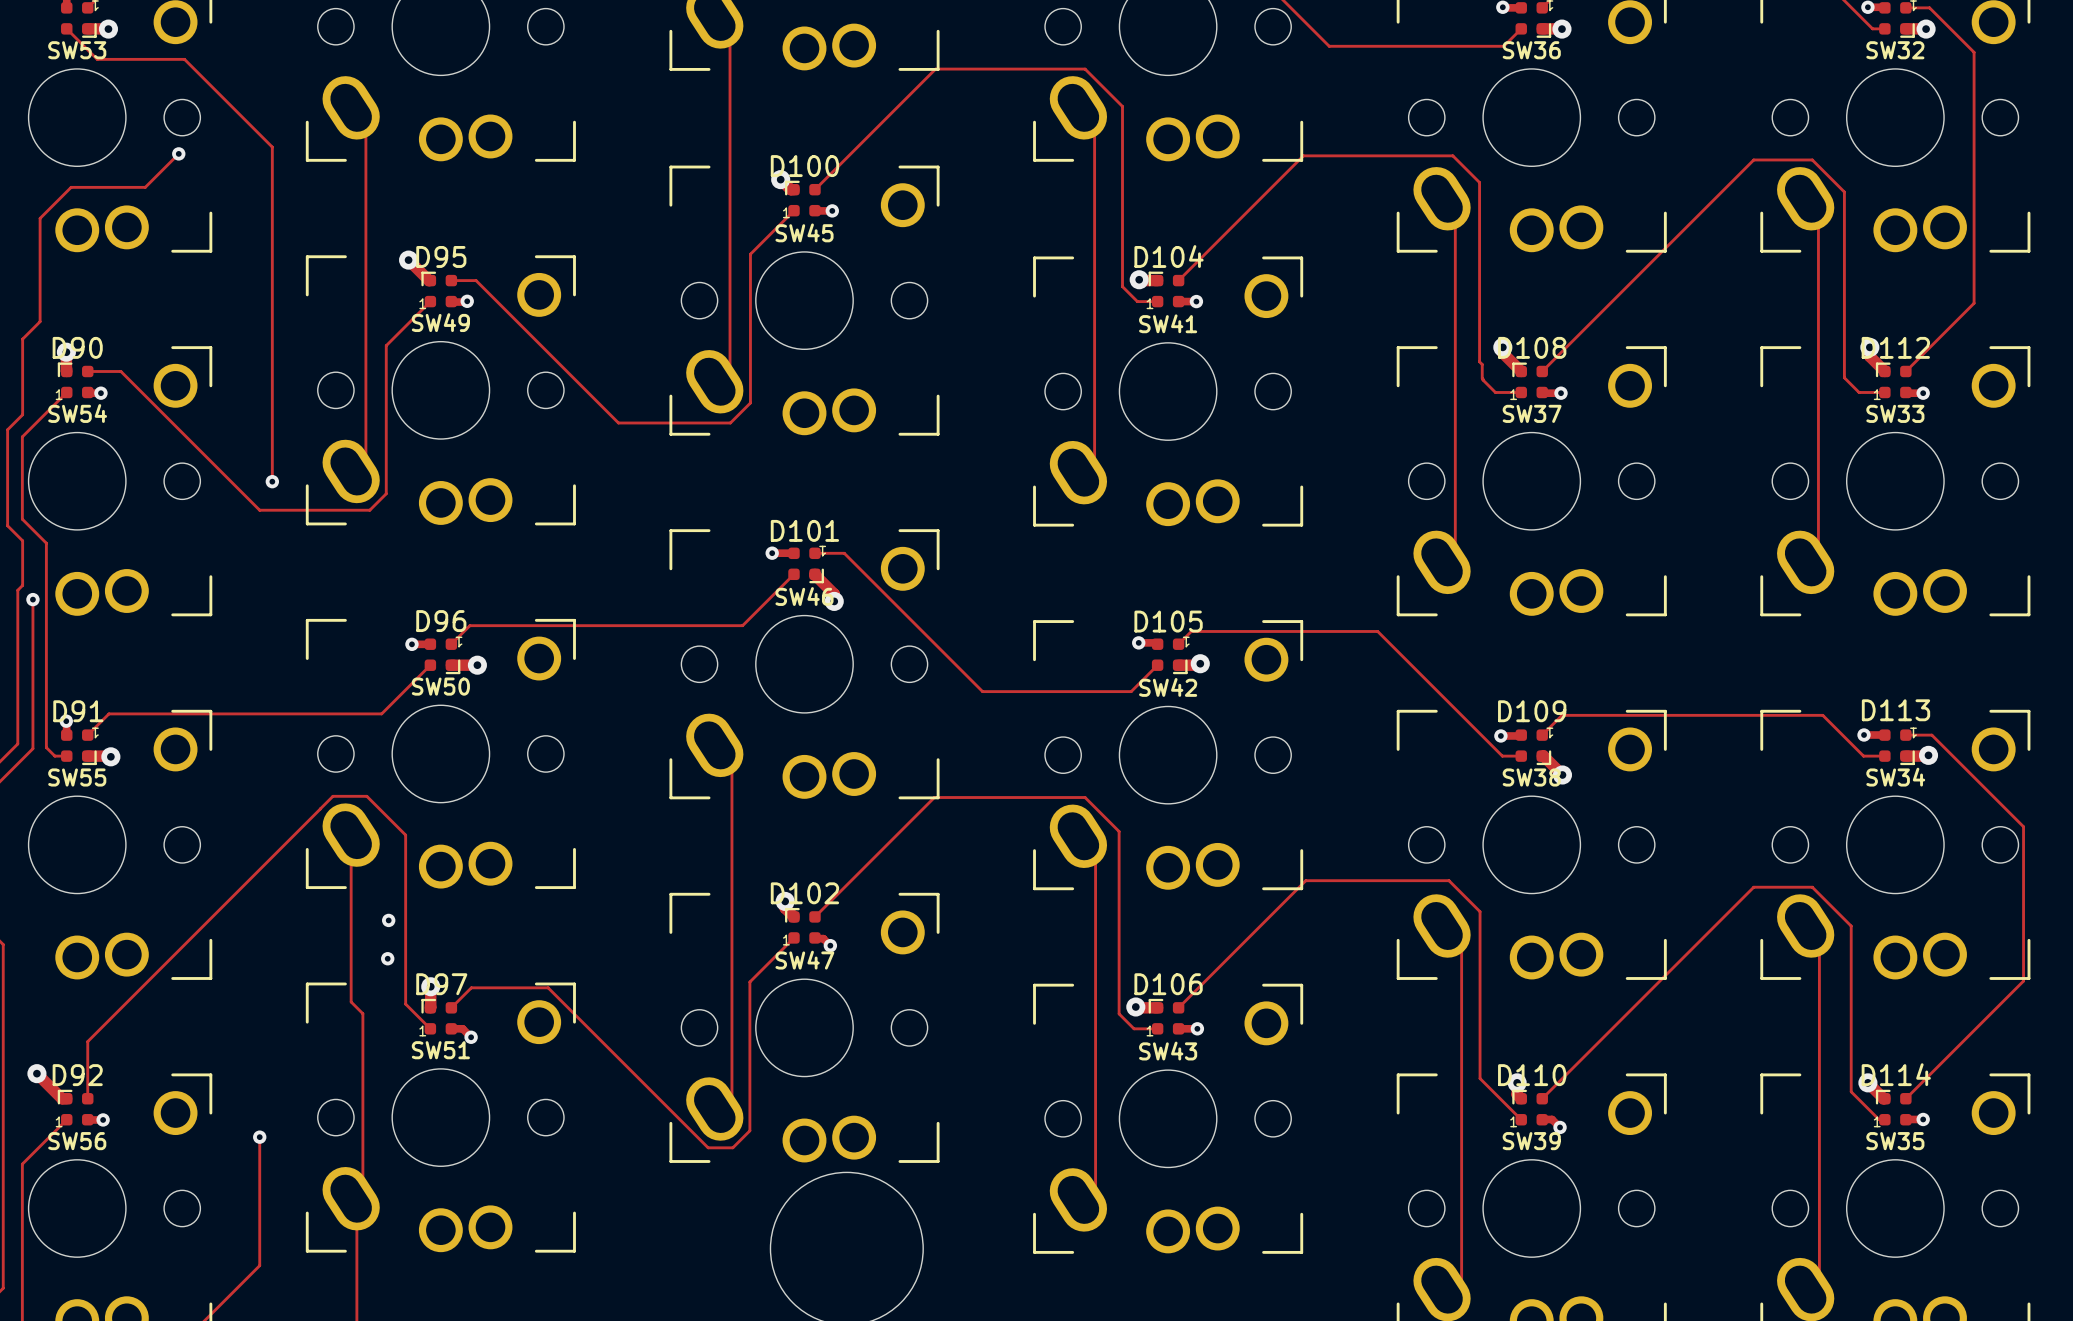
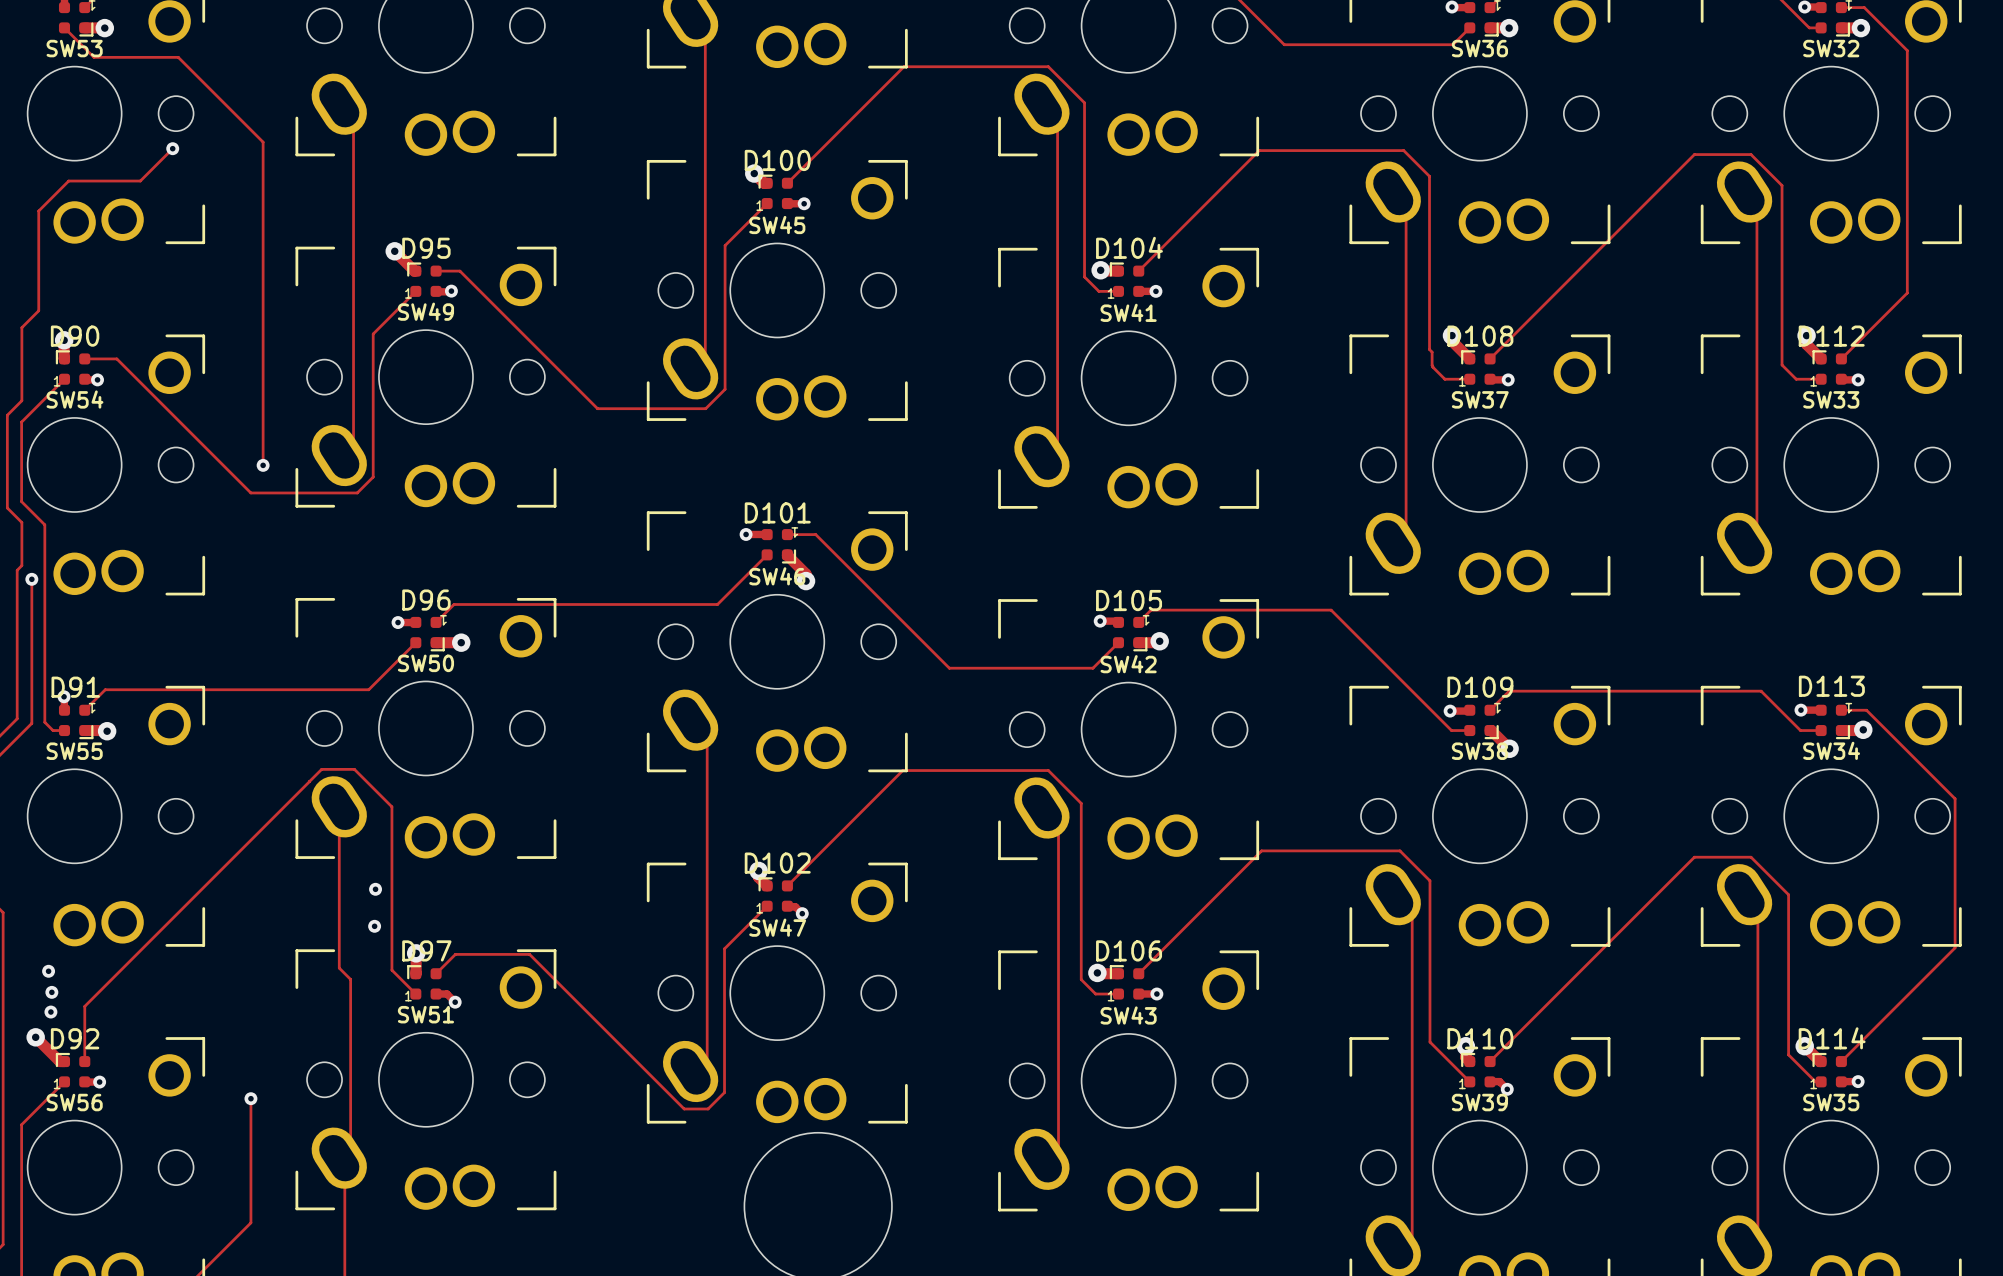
via: none -> (48, 971)
via: none -> (51, 992)
via: none -> (50, 1012)

